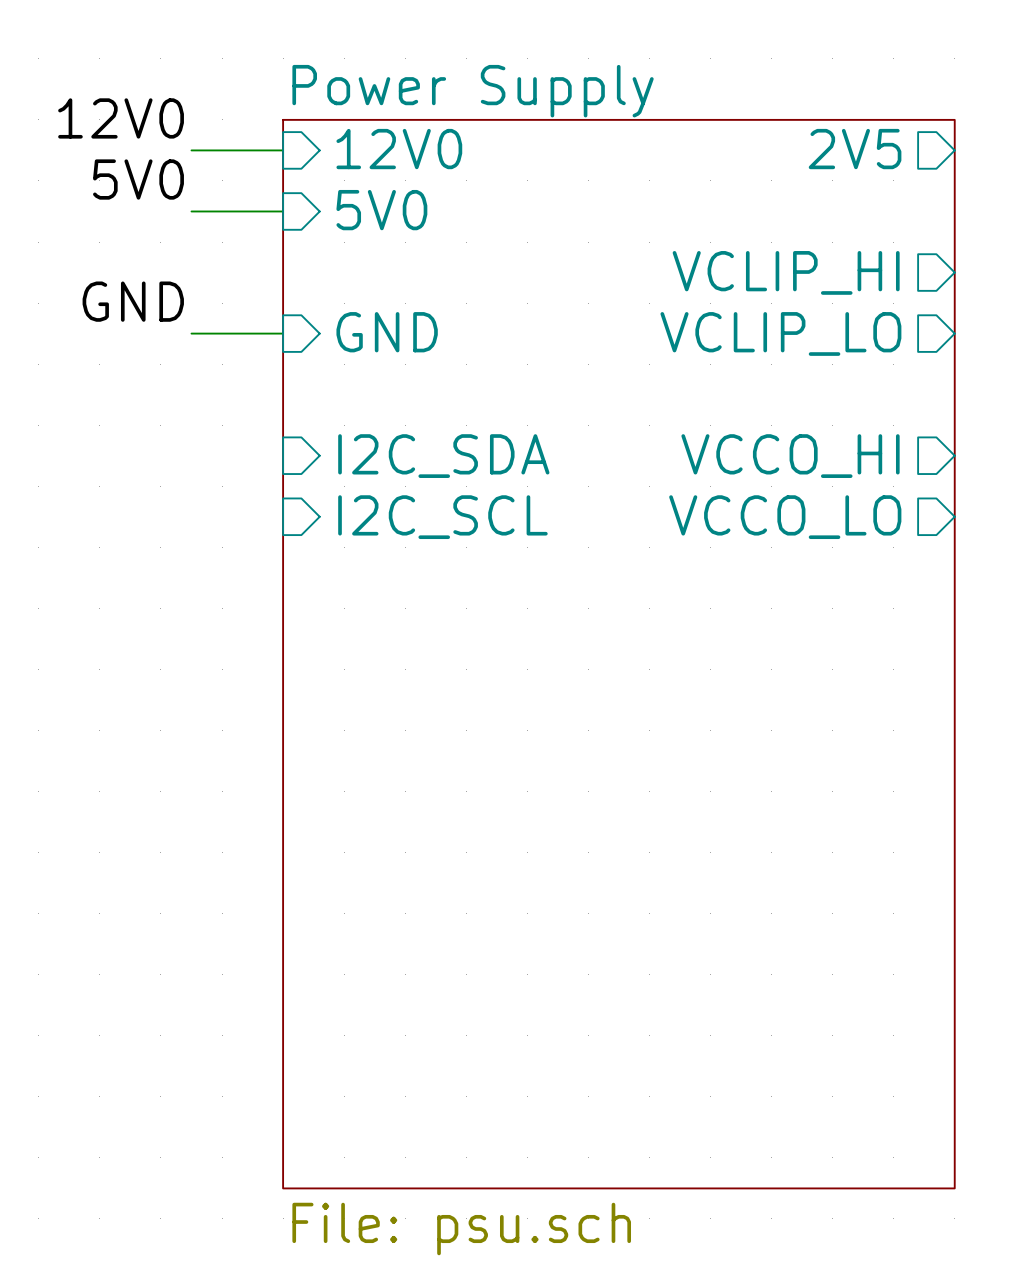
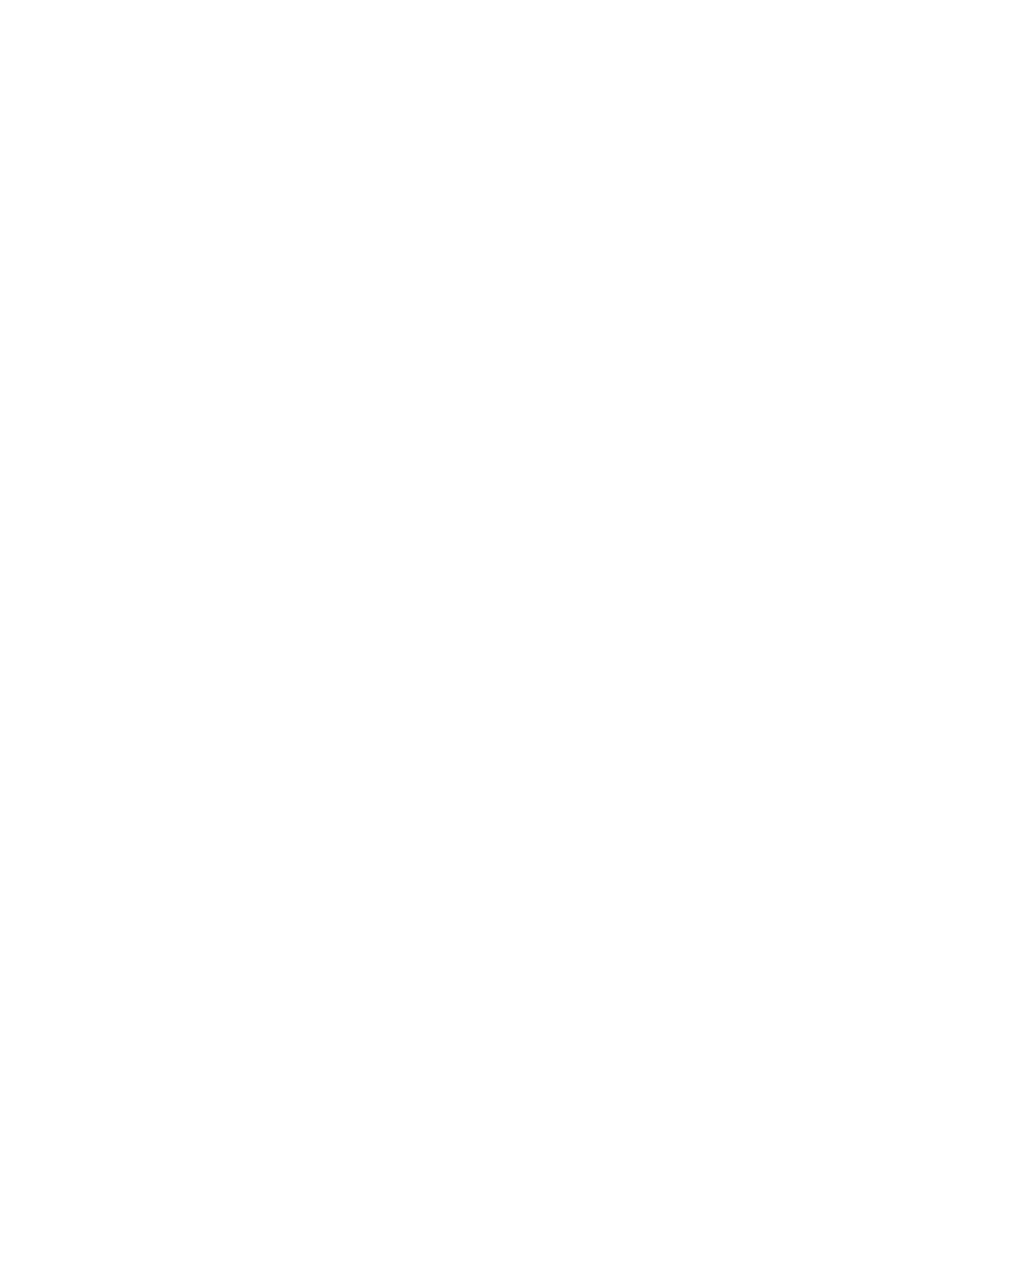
label: 12V0 (121, 118) -> none
sheet pin: 12V0 (399, 149) -> none
sheet pin: 2V5 (855, 149) -> none
wire: (191, 150) (283, 150) -> none
label: 5V0 (138, 179) -> none
sheet pin: 5V0 (381, 210) -> none
wire: (191, 211) (283, 211) -> none
sheet pin: VCLIP_HI (786, 272) -> none
label: GND (133, 301) -> none
sheet pin: GND (387, 332) -> none
wire: (191, 333) (283, 333) -> none
sheet pin: VCLIP_LO (780, 333) -> none
sheet pin: I2C_SDA (443, 456) -> none
sheet pin: VCCO_HI (790, 456) -> none
sheet pin: I2C_SCL (442, 517) -> none
sheet pin: VCCO_LO (785, 517) -> none
sheet Power Supply: File: psu.sch (618, 654) -> none

